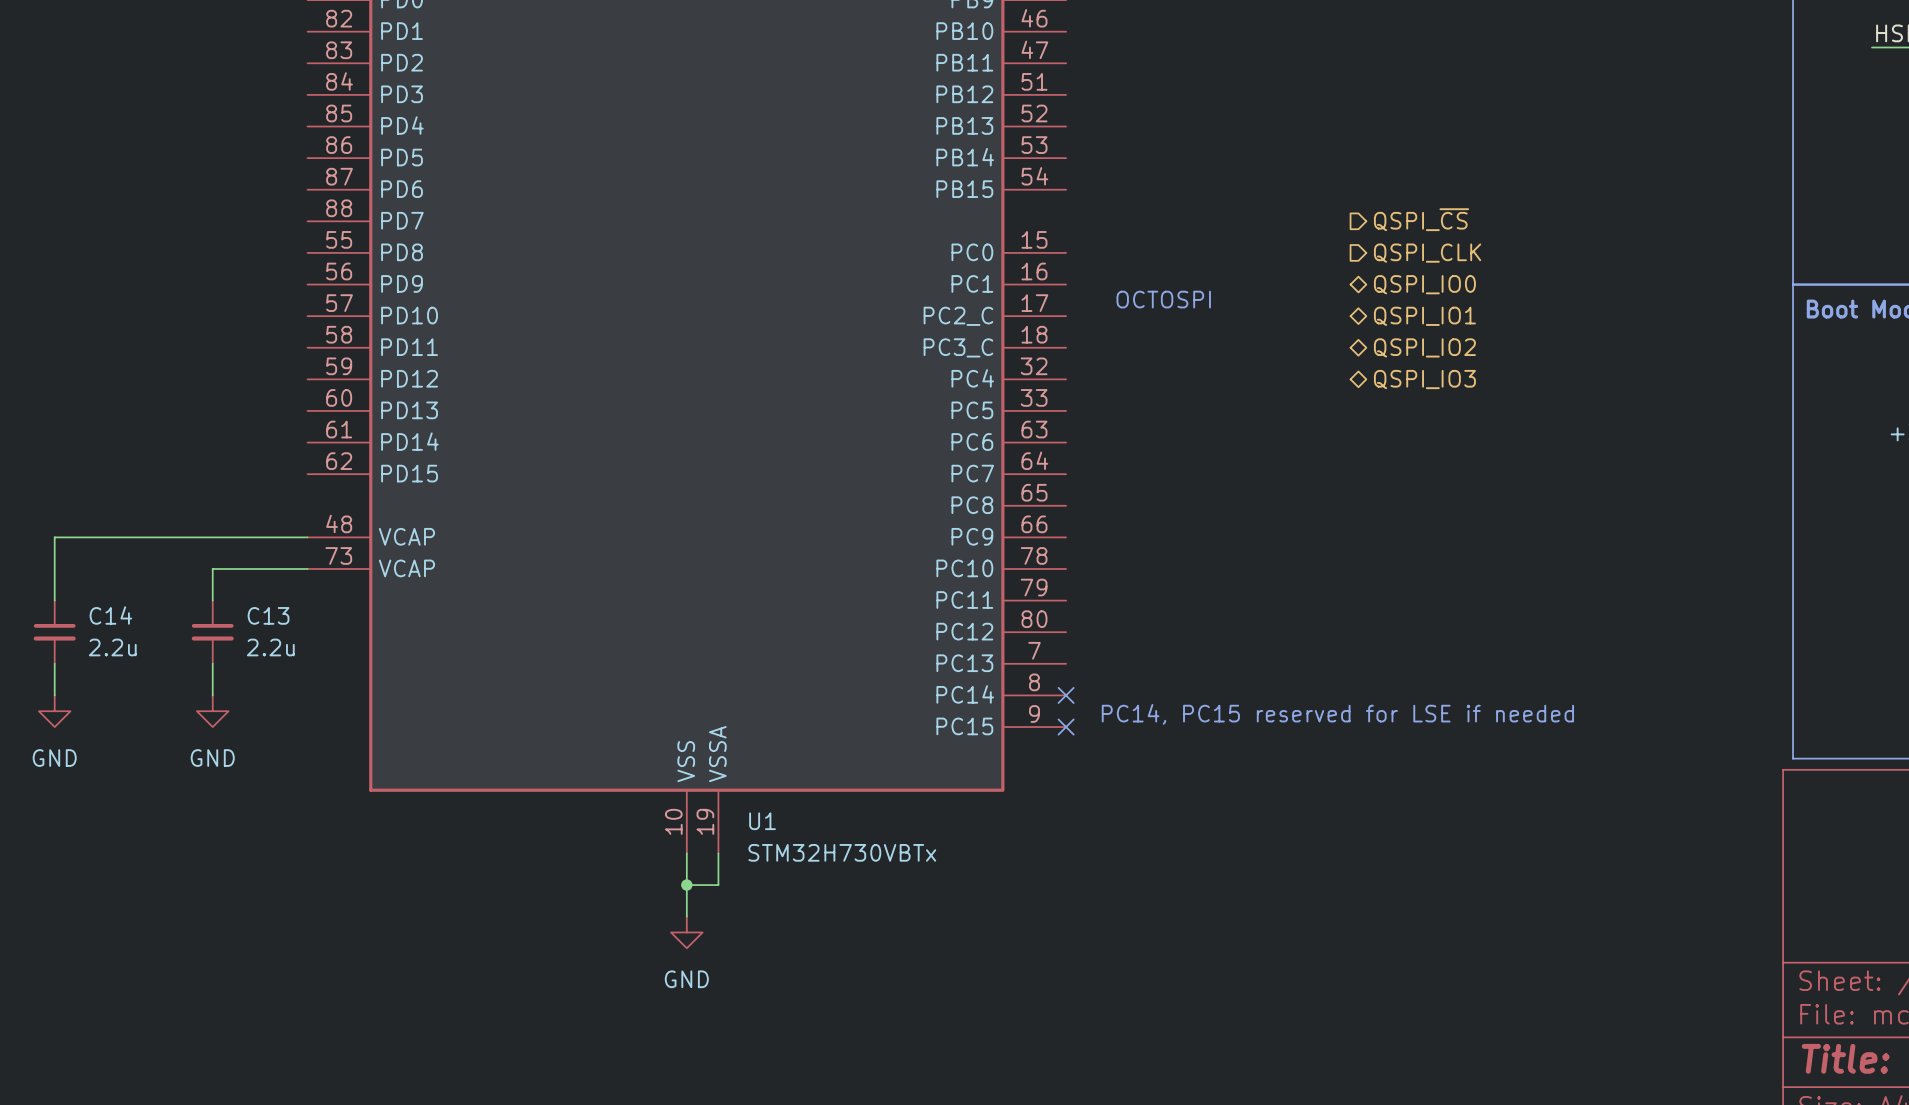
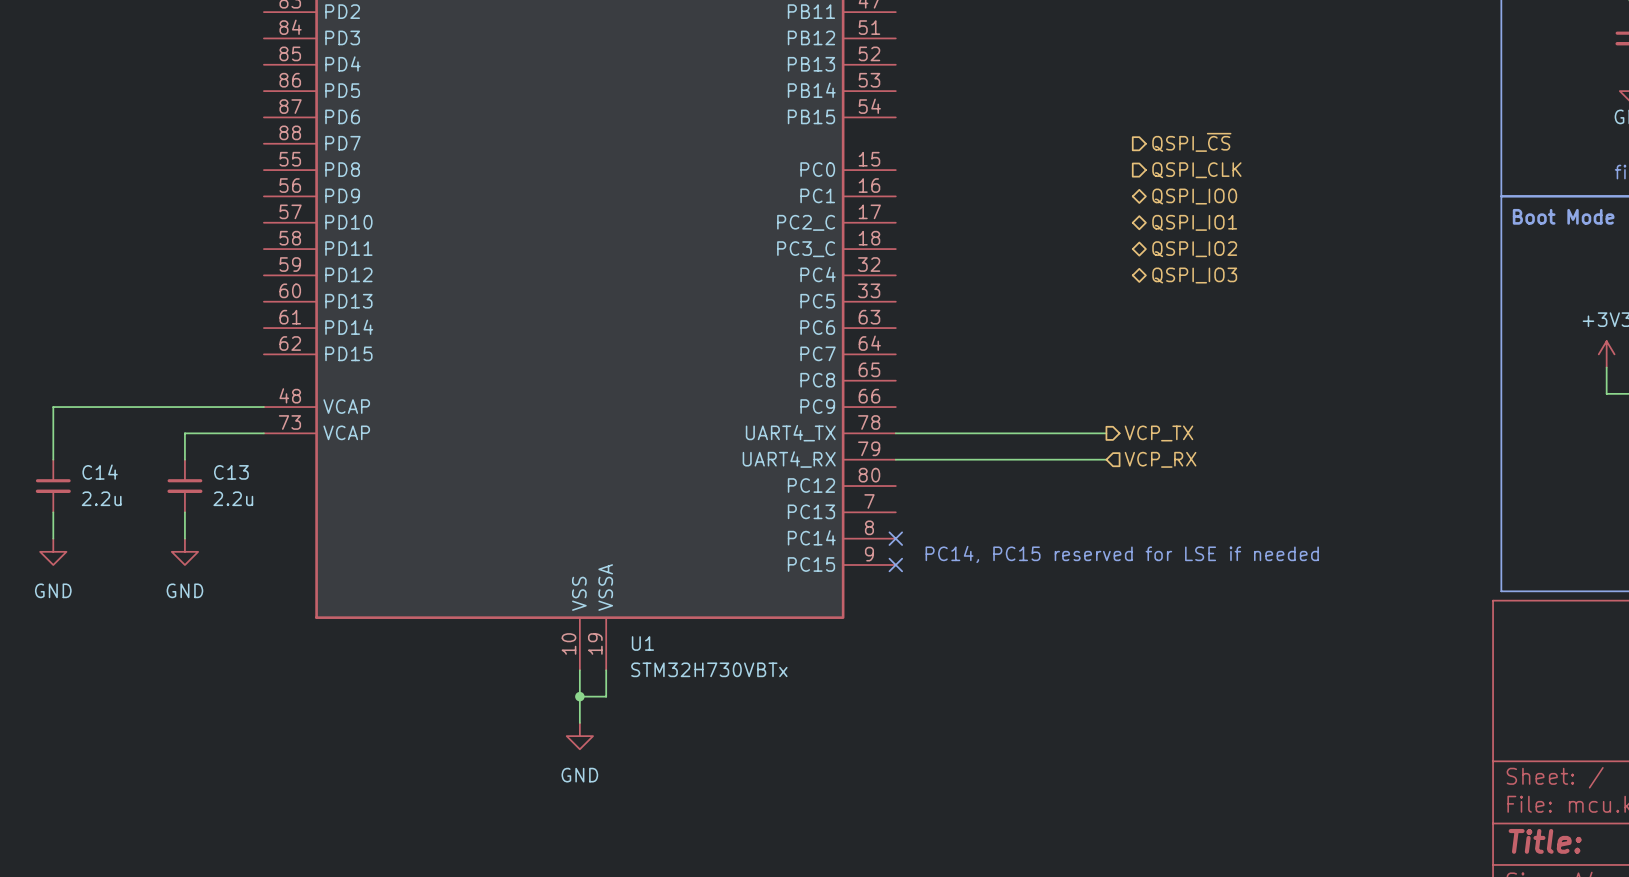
text: OCTOSPI (1163, 299) -> none
U1 pin name: PC10 (964, 568) -> UART4_TX (790, 433)
wire: none -> (895, 433) (1106, 433)
hierarchical label: none -> VCP_TX (1158, 433)
U1 pin name: PC11 (964, 600) -> UART4_RX (789, 459)
wire: none -> (895, 459) (1106, 459)
hierarchical label: none -> VCP_RX (1160, 459)

